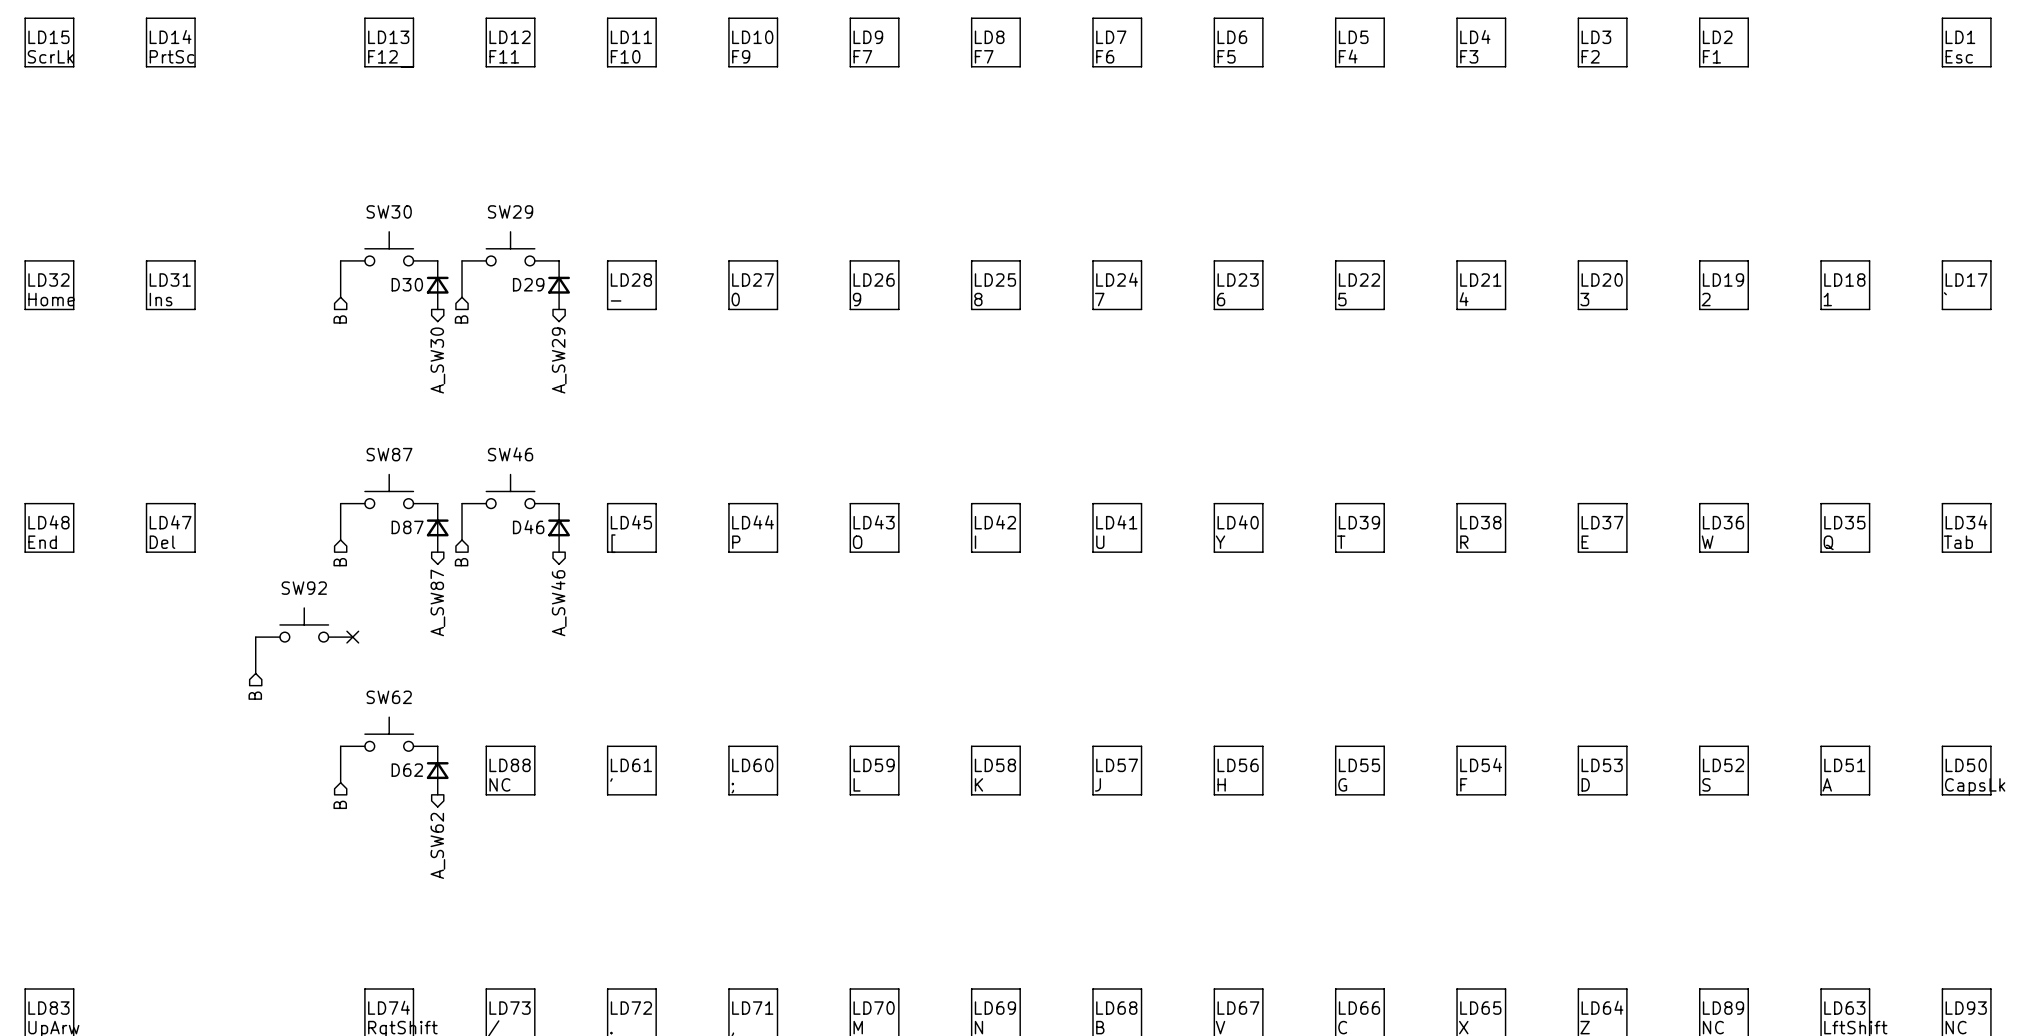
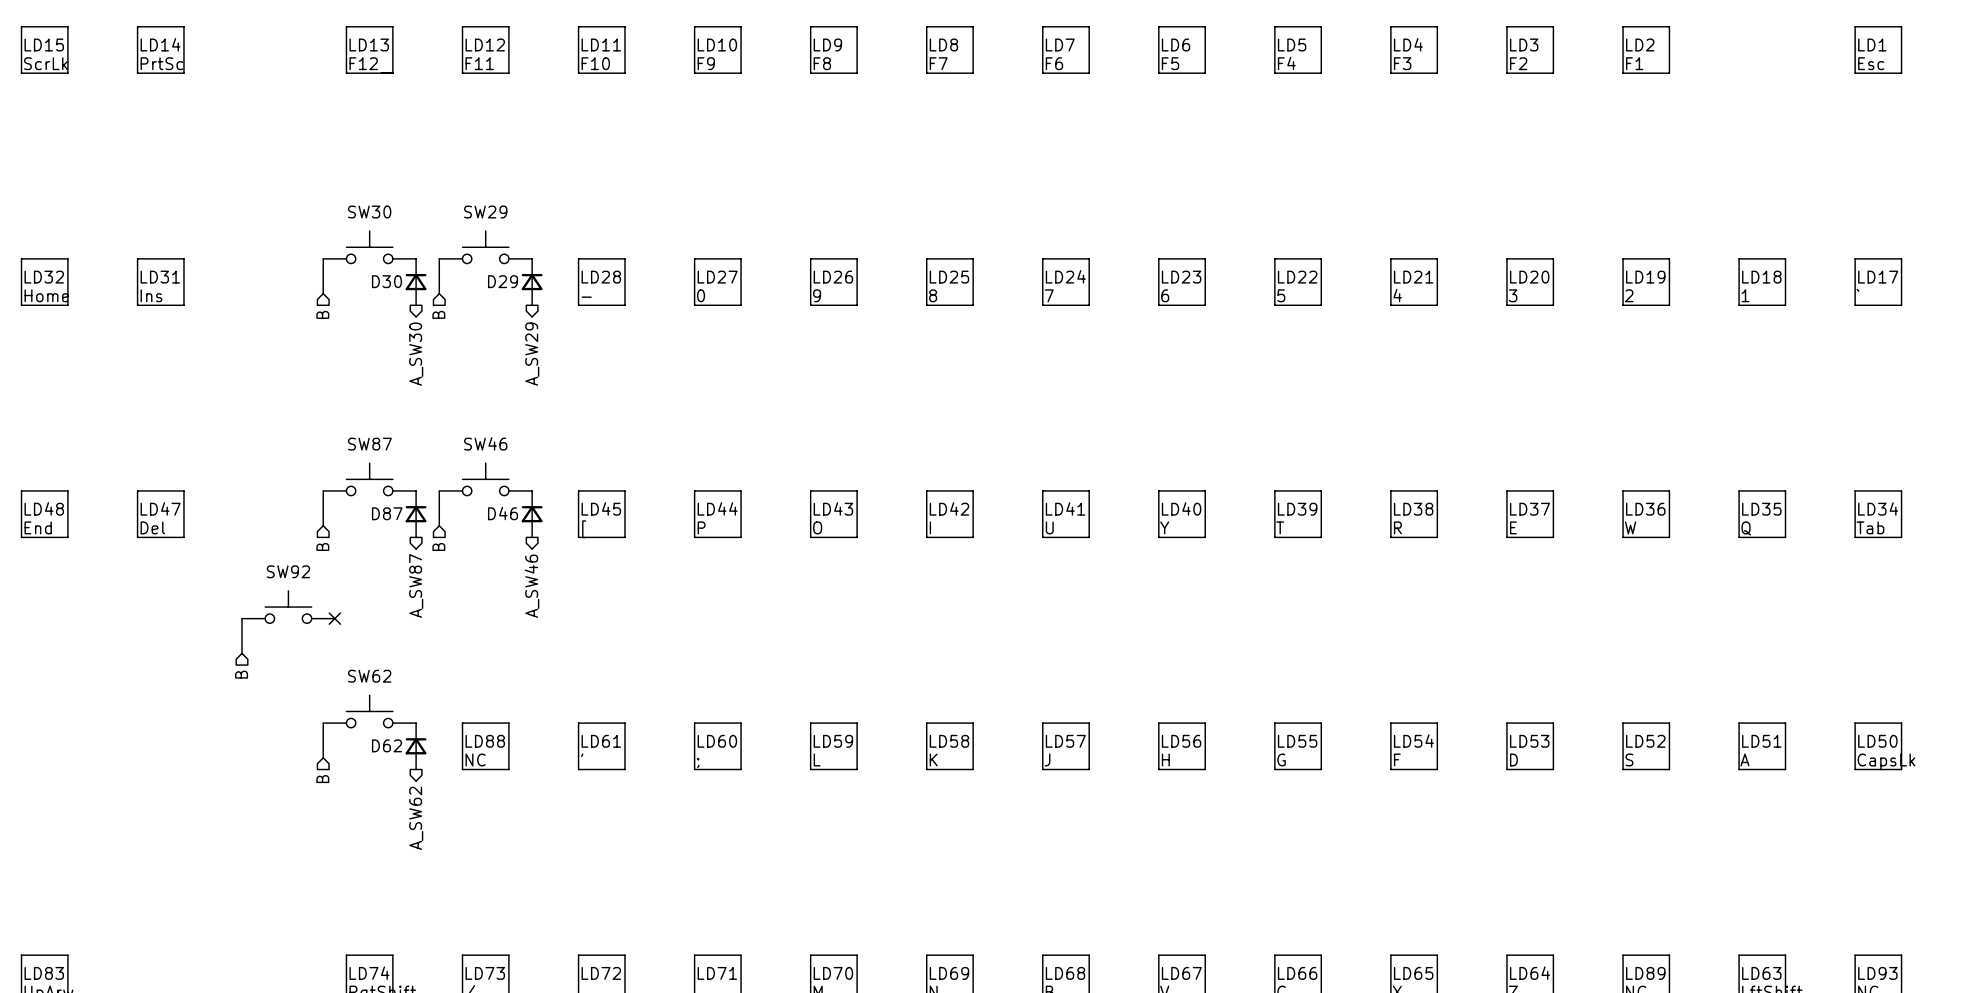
text: F7 (862, 56) -> F8 (822, 63)

